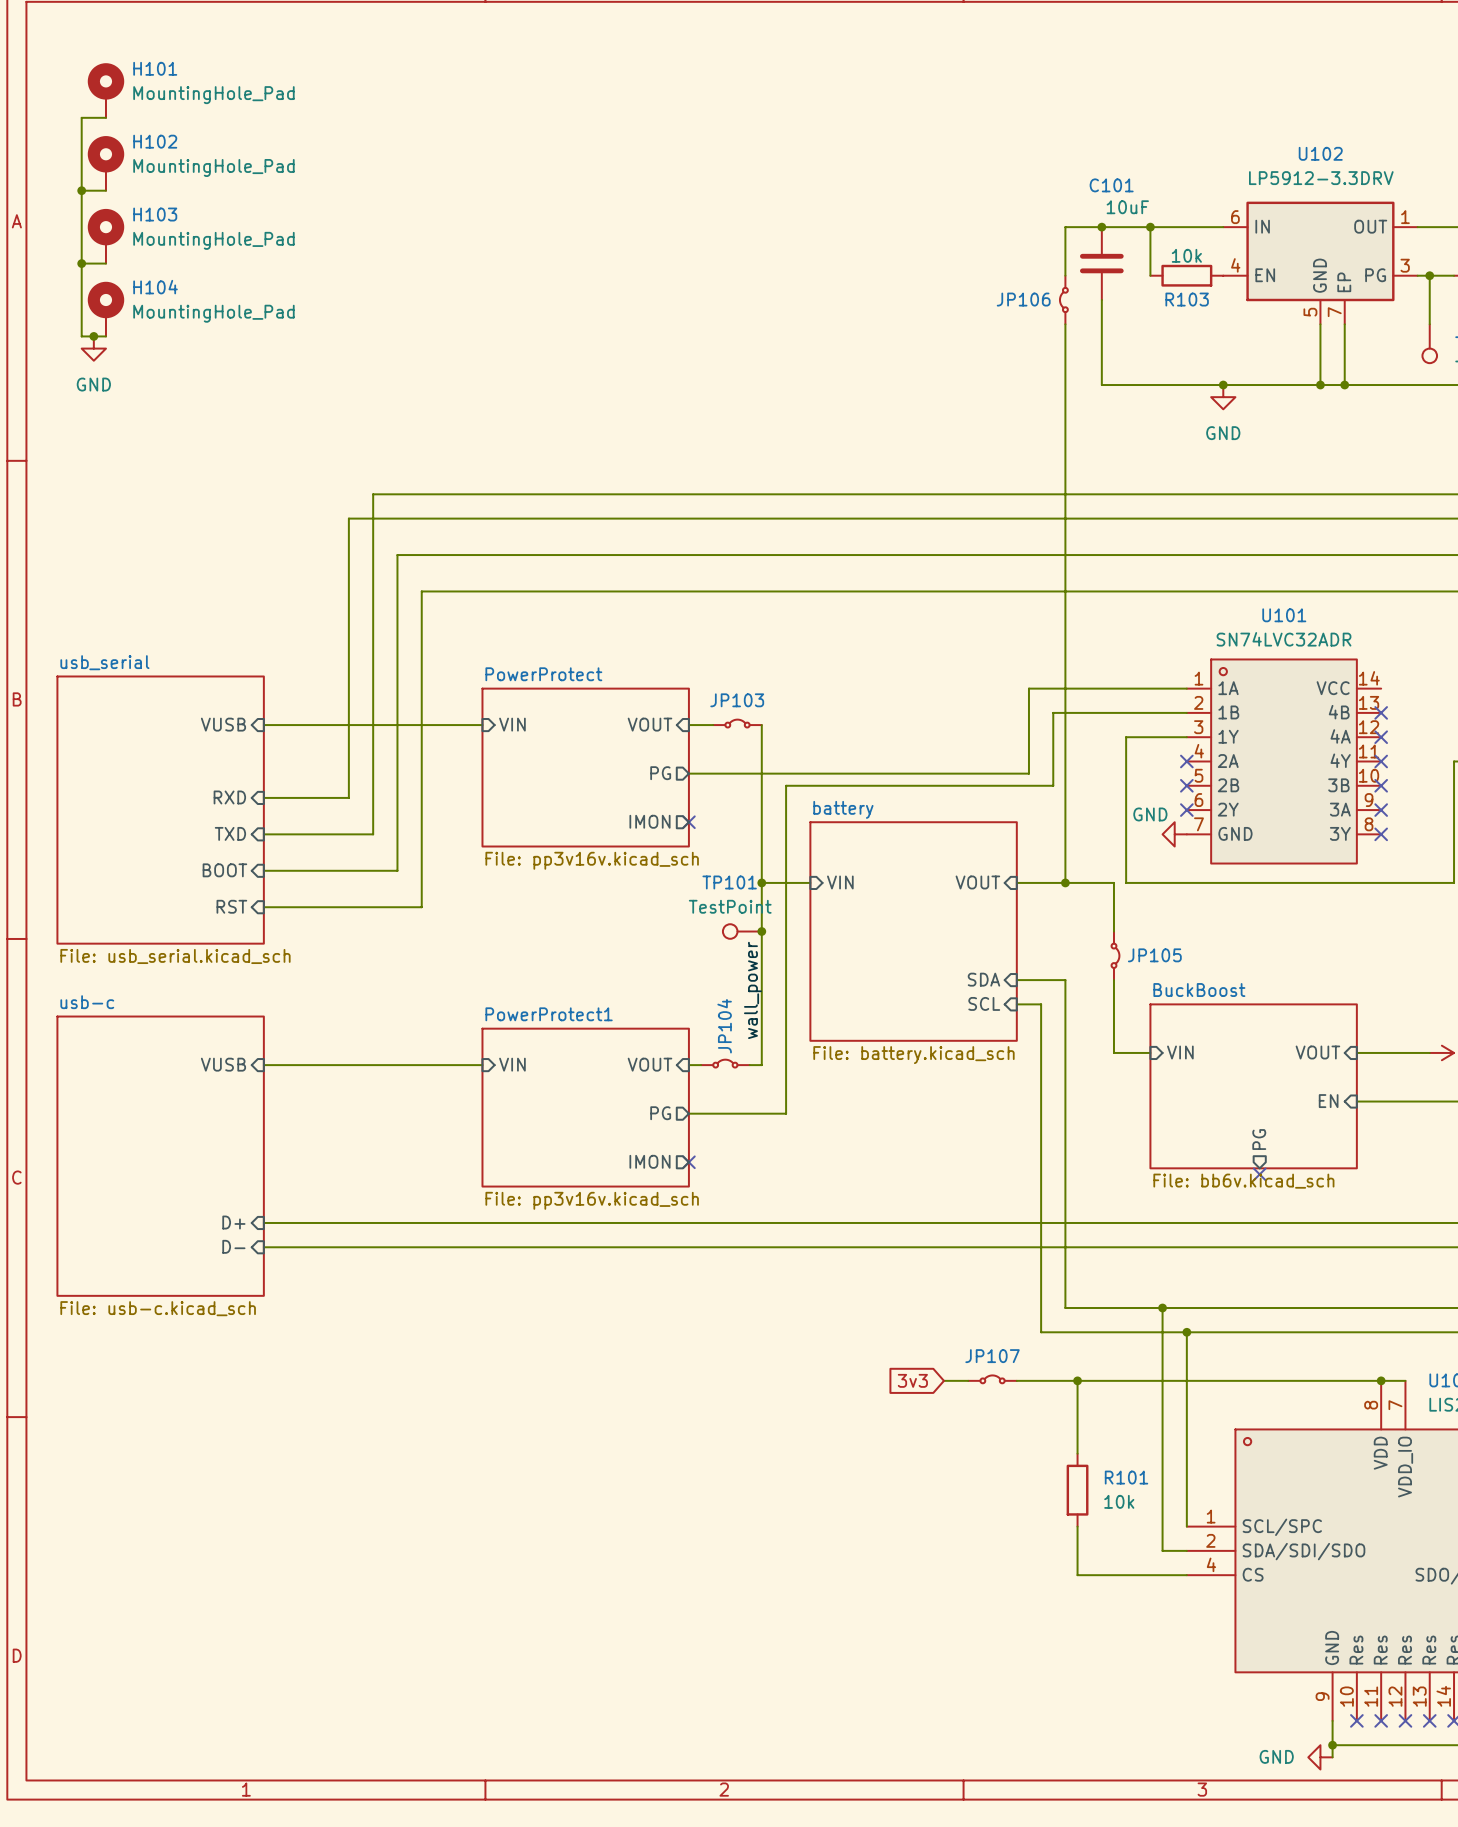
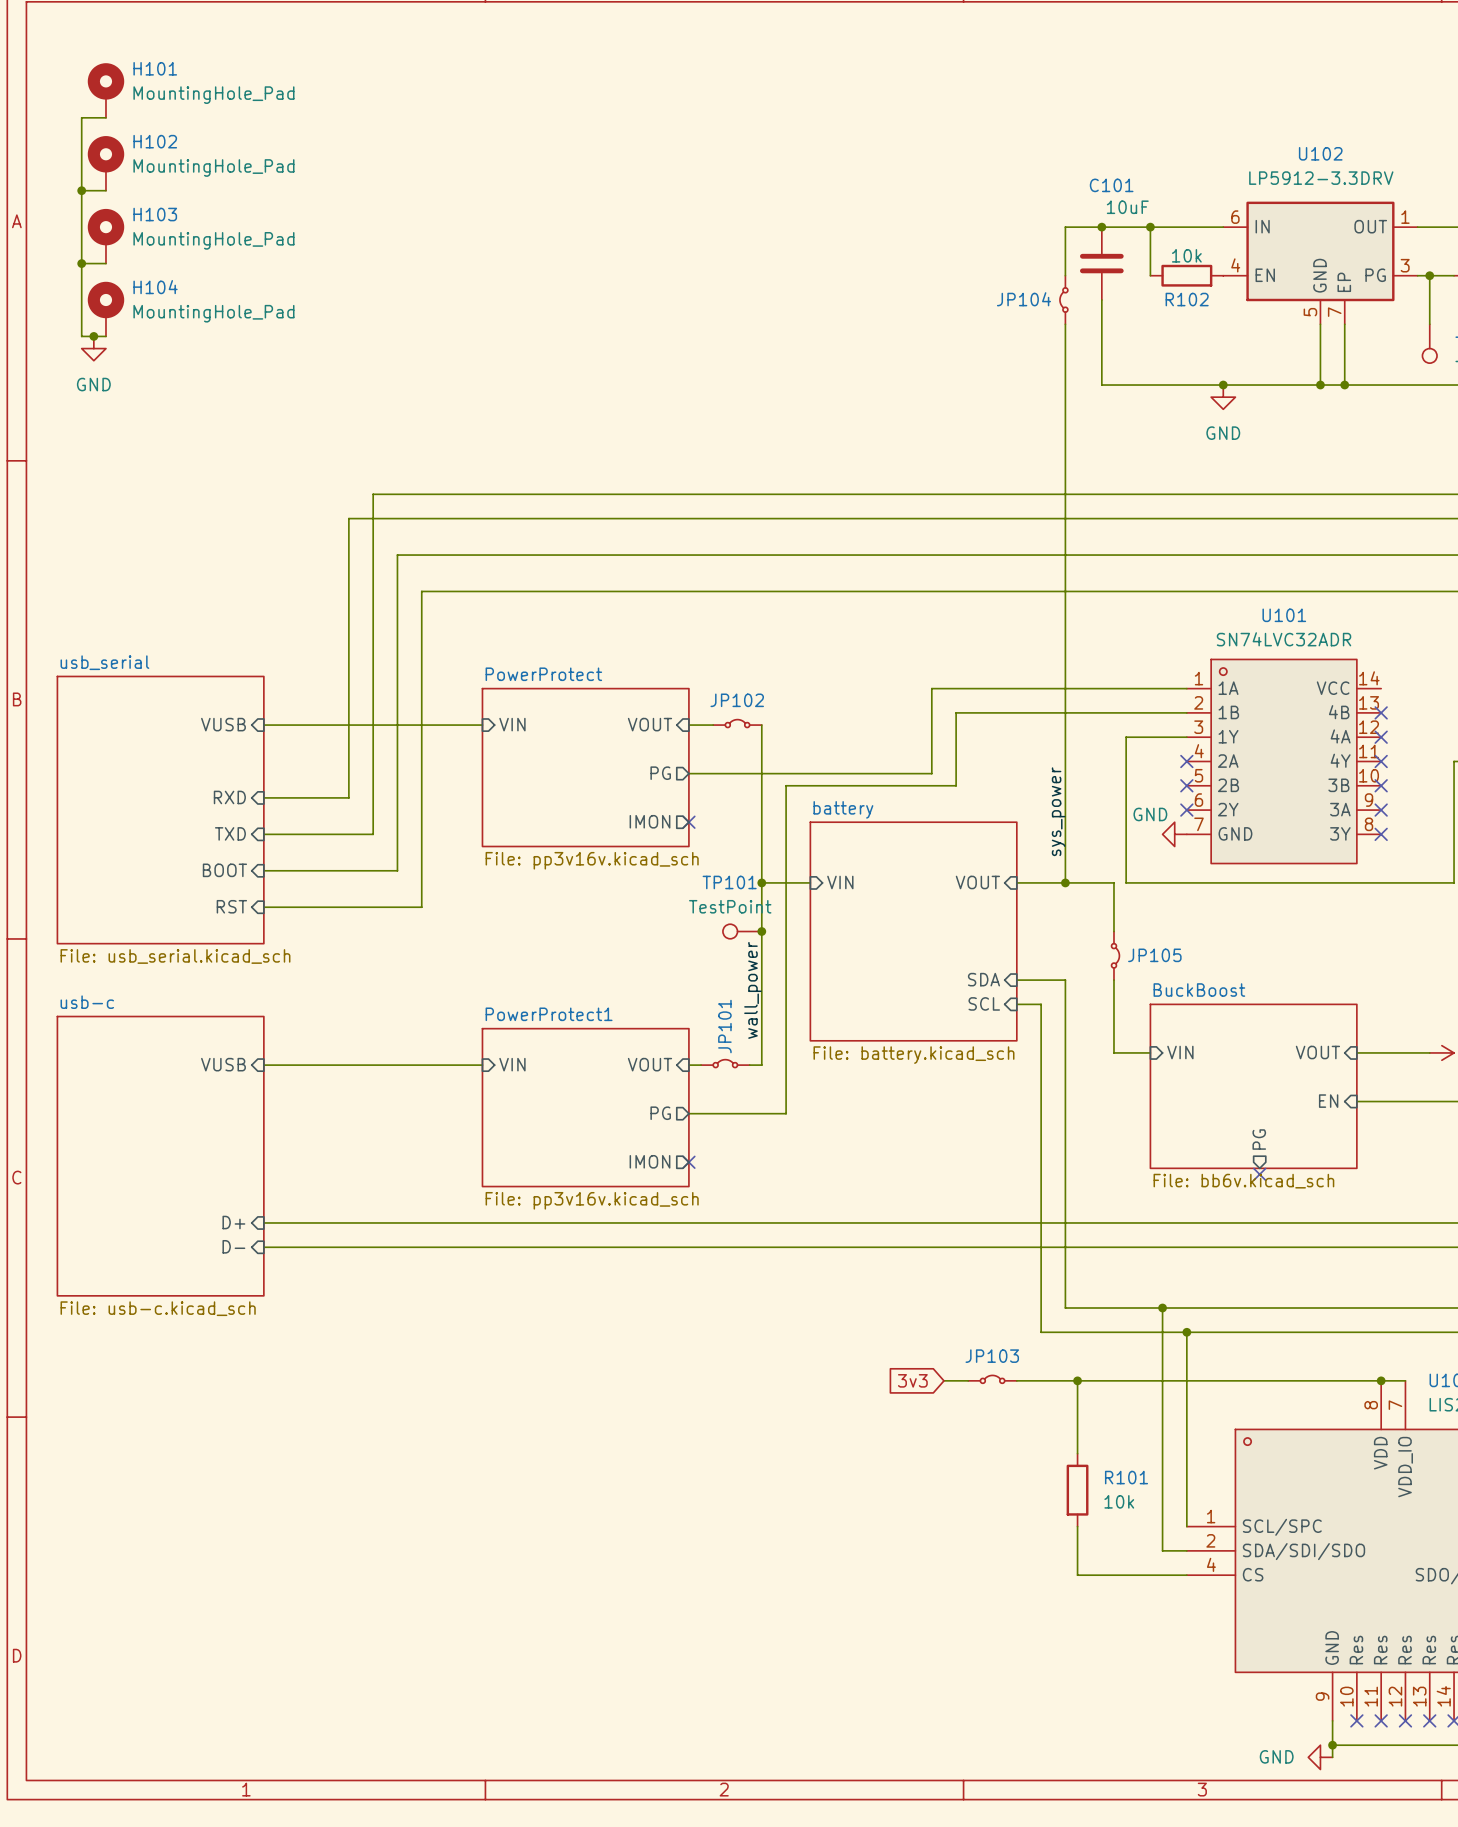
JP106 name: JP106 (1023, 299) -> JP104 (1023, 299)
R103 name: R103 (1187, 299) -> R102 (1187, 299)
wire: (1028, 688) (1028, 773) (931, 773) -> (1028, 688) (931, 688) (931, 773)
JP103 name: JP103 (737, 700) -> JP102 (737, 700)
wire: (1053, 712) (1053, 785) (956, 785) -> (1053, 712) (956, 712) (956, 785)
label: none -> sys_power (1058, 811)
JP104 name: JP104 (724, 1026) -> JP101 (724, 1026)
JP107 name: JP107 (992, 1356) -> JP103 (992, 1356)

